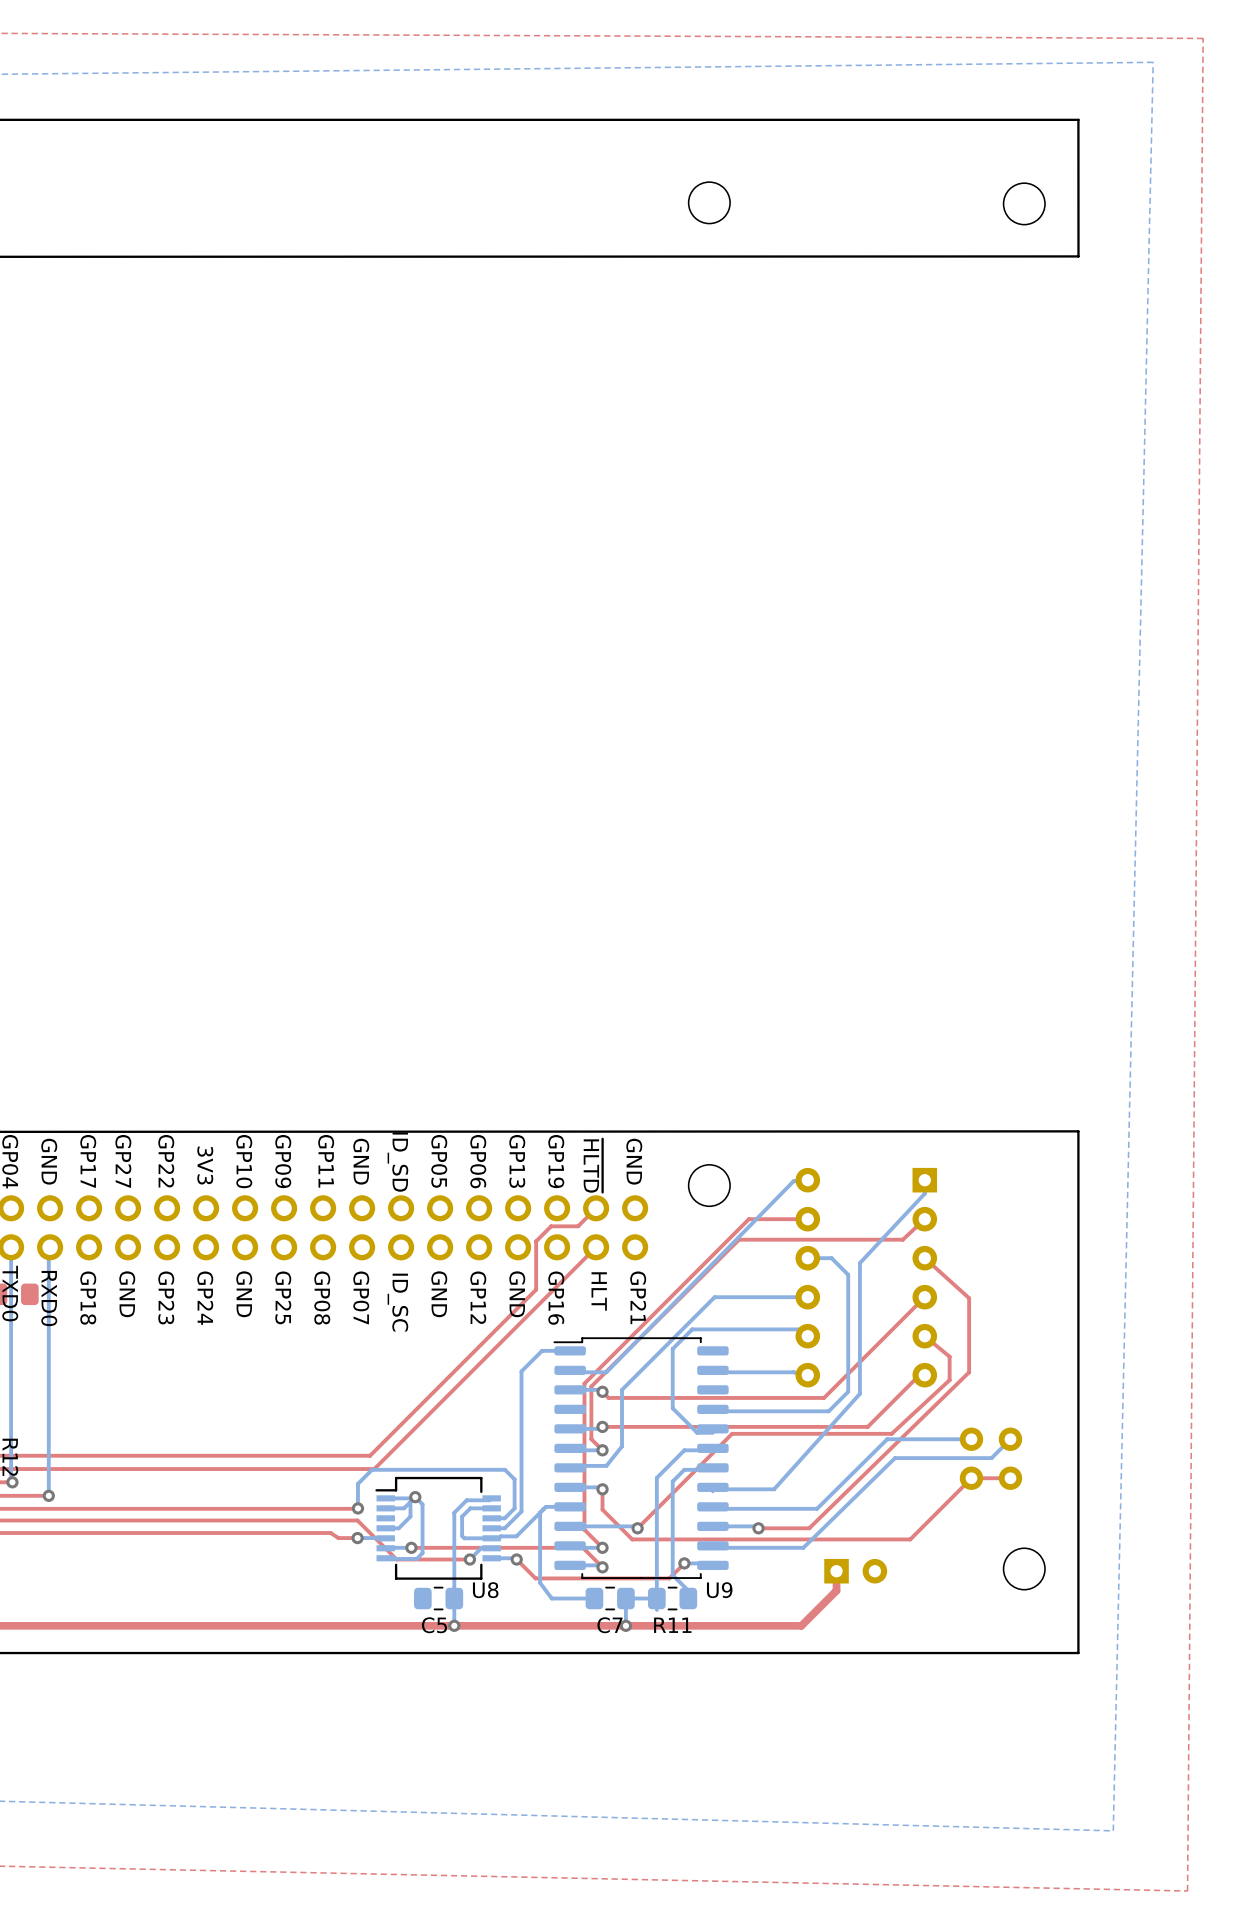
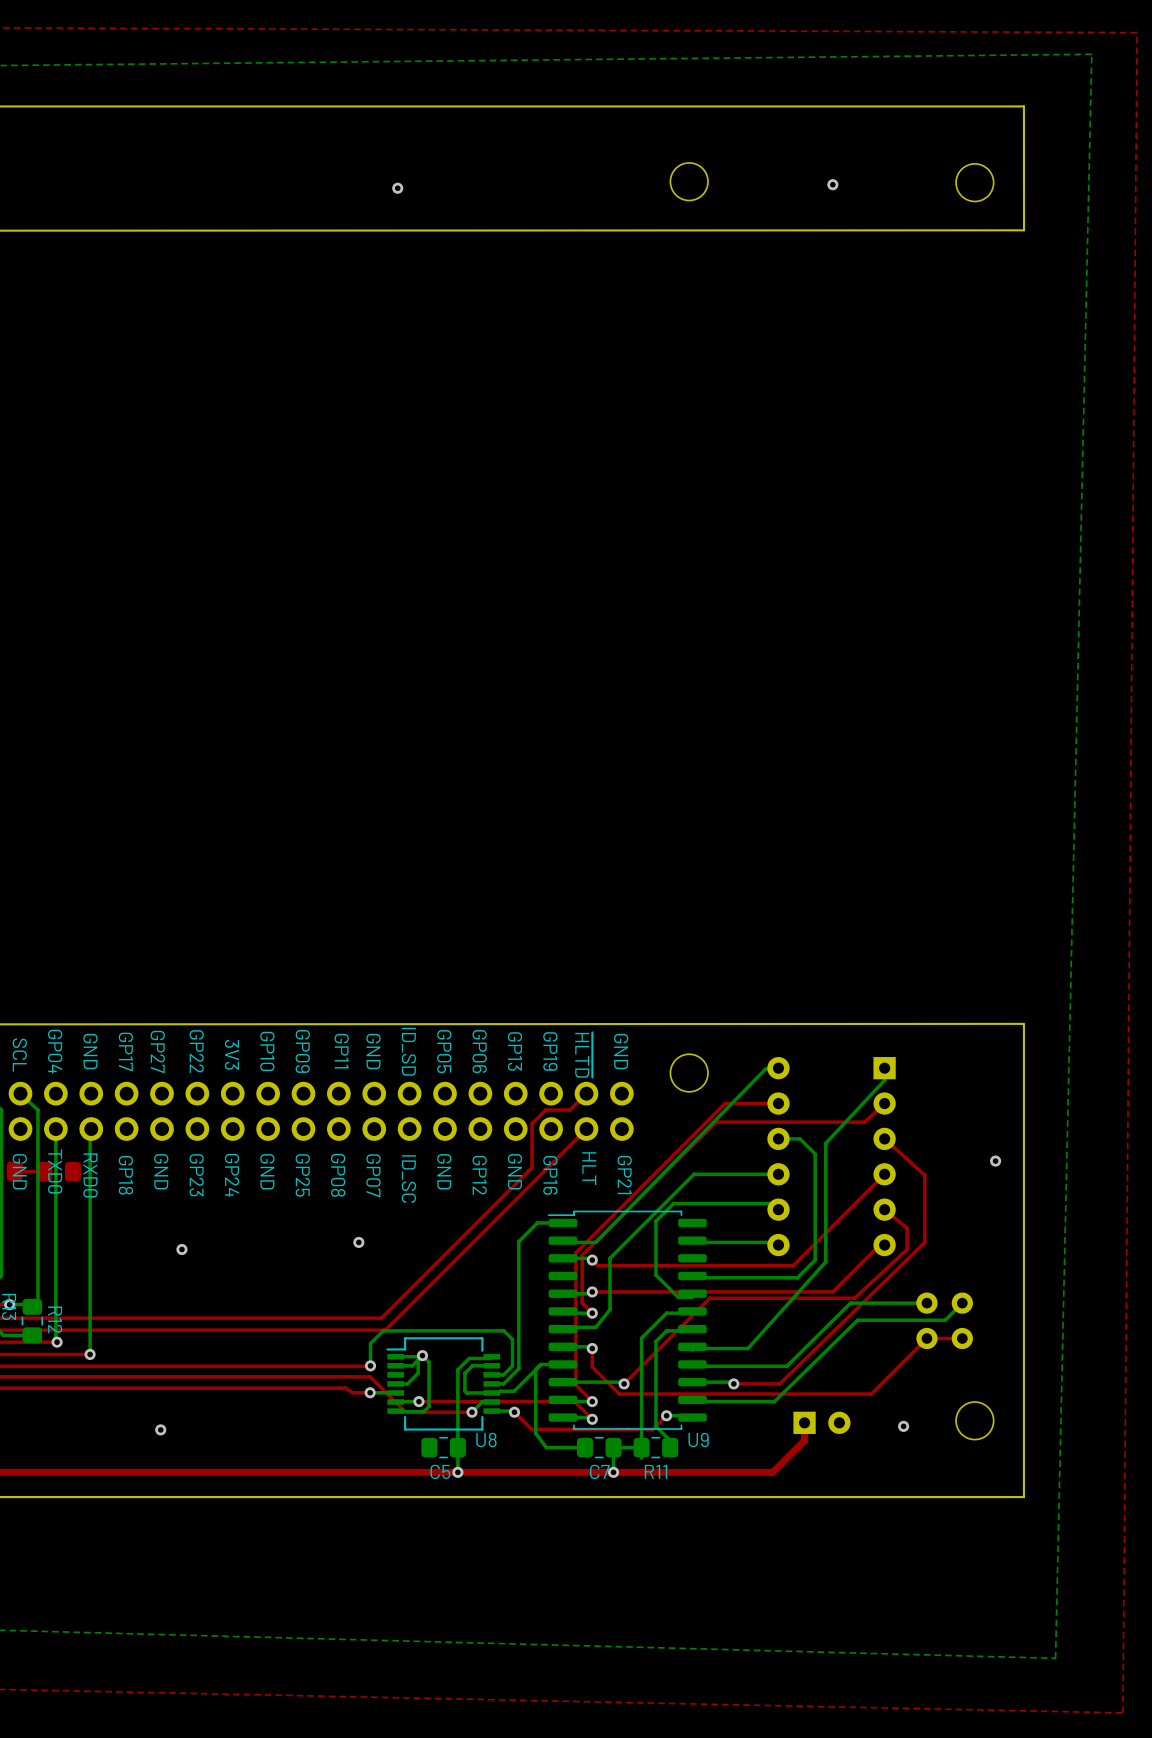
via: none -> (832, 184)
via: none -> (397, 188)
via: none -> (995, 1161)
via: none -> (358, 1242)
via: none -> (181, 1249)
via: none -> (903, 1426)
via: none -> (160, 1429)

